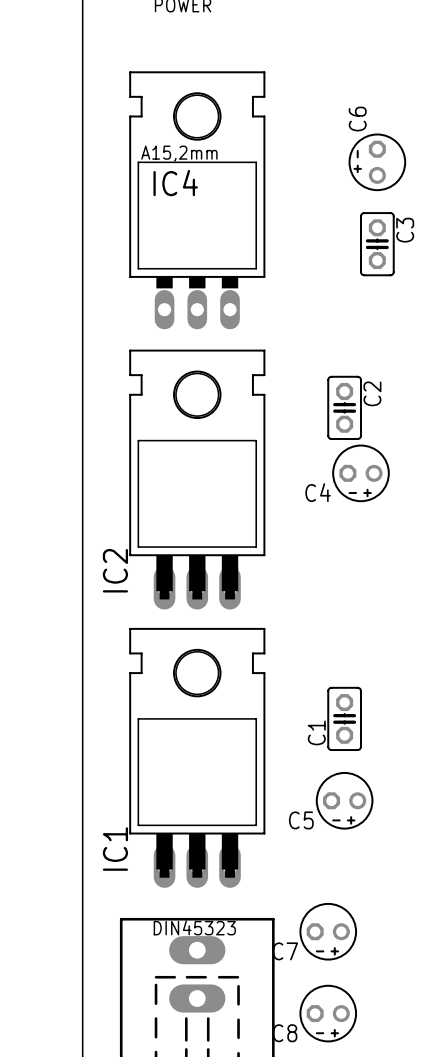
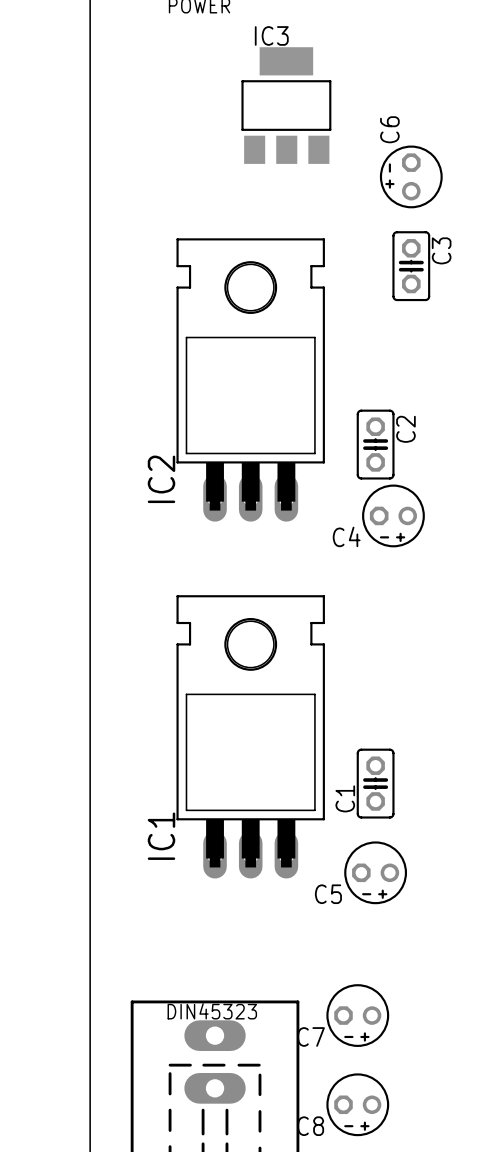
IC3: none -> (286, 105)
IC4: (197, 200) -> none
IC2 position: (197, 479) -> (250, 379)
IC1 position: (197, 757) -> (250, 736)

